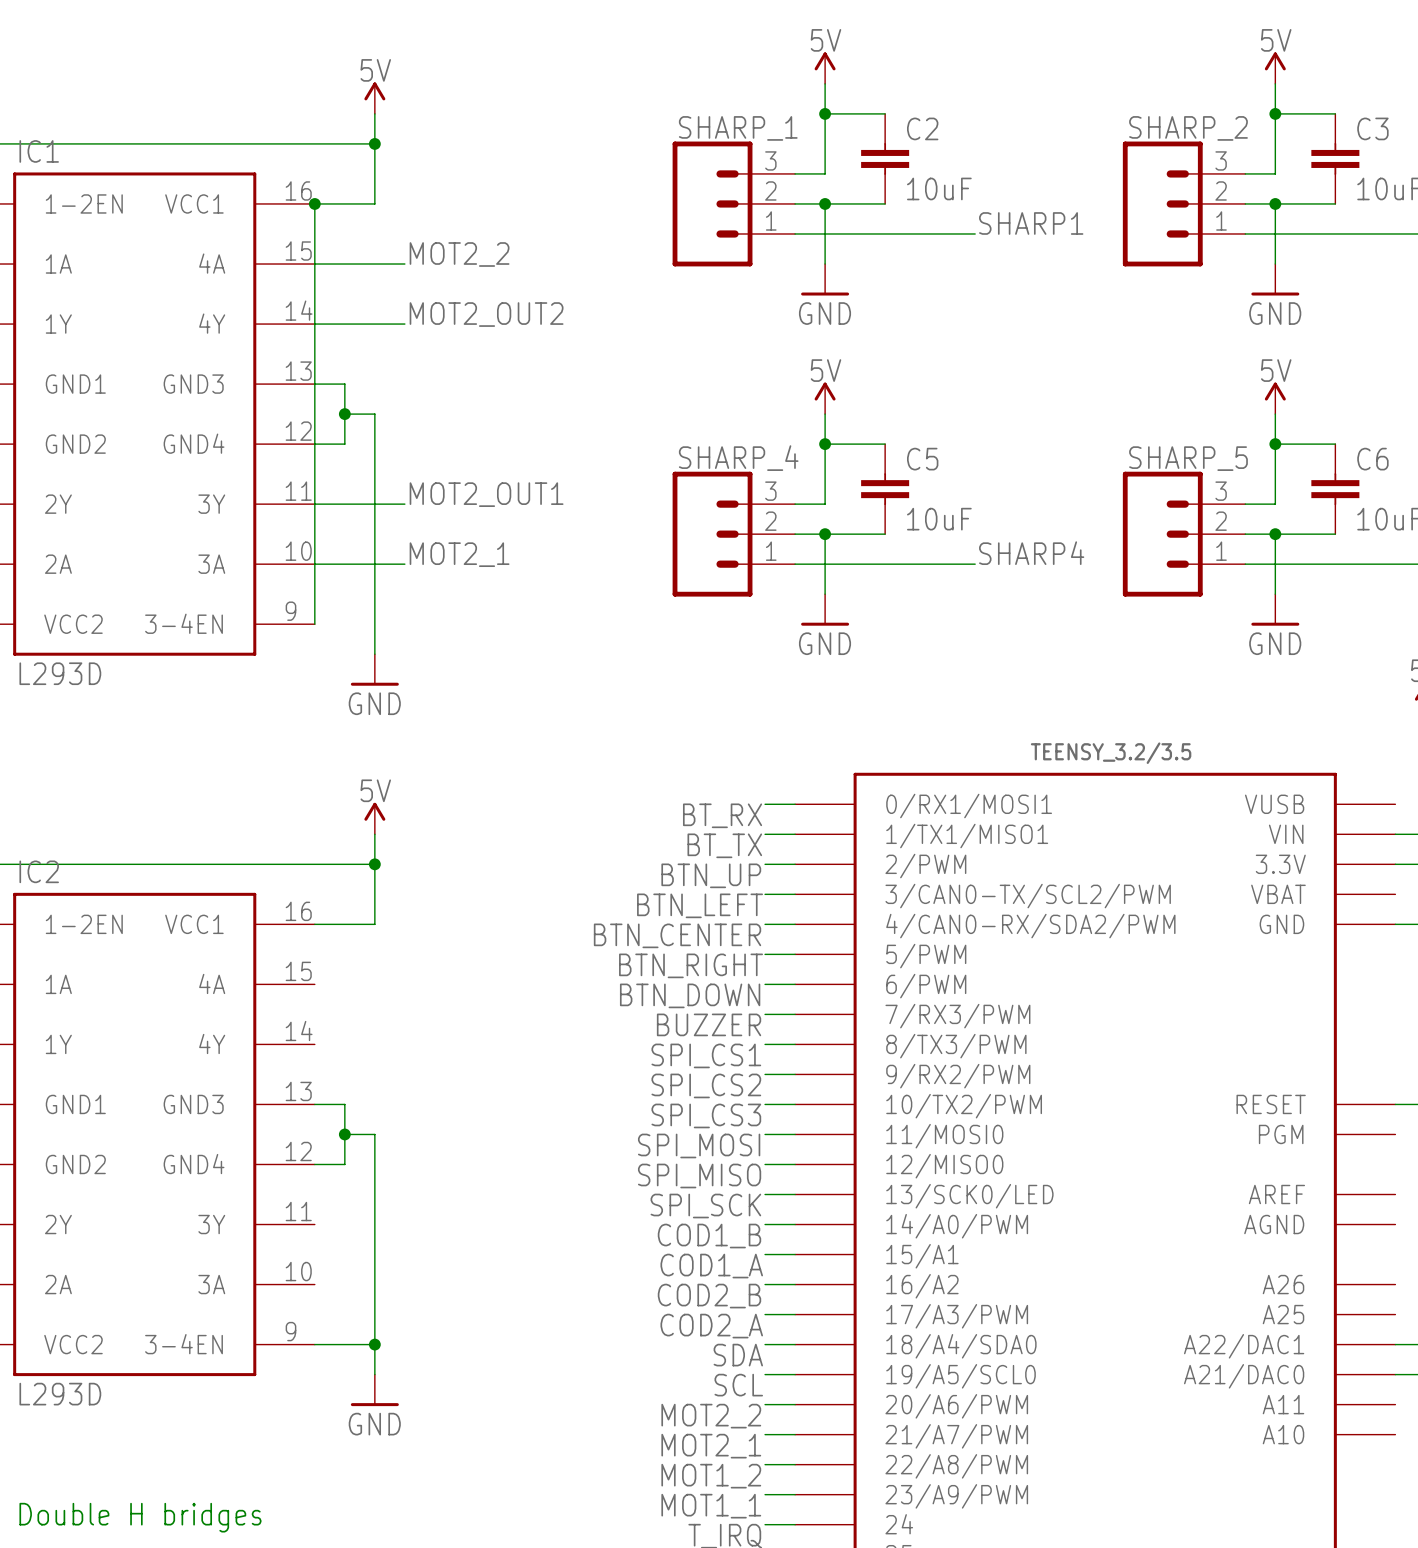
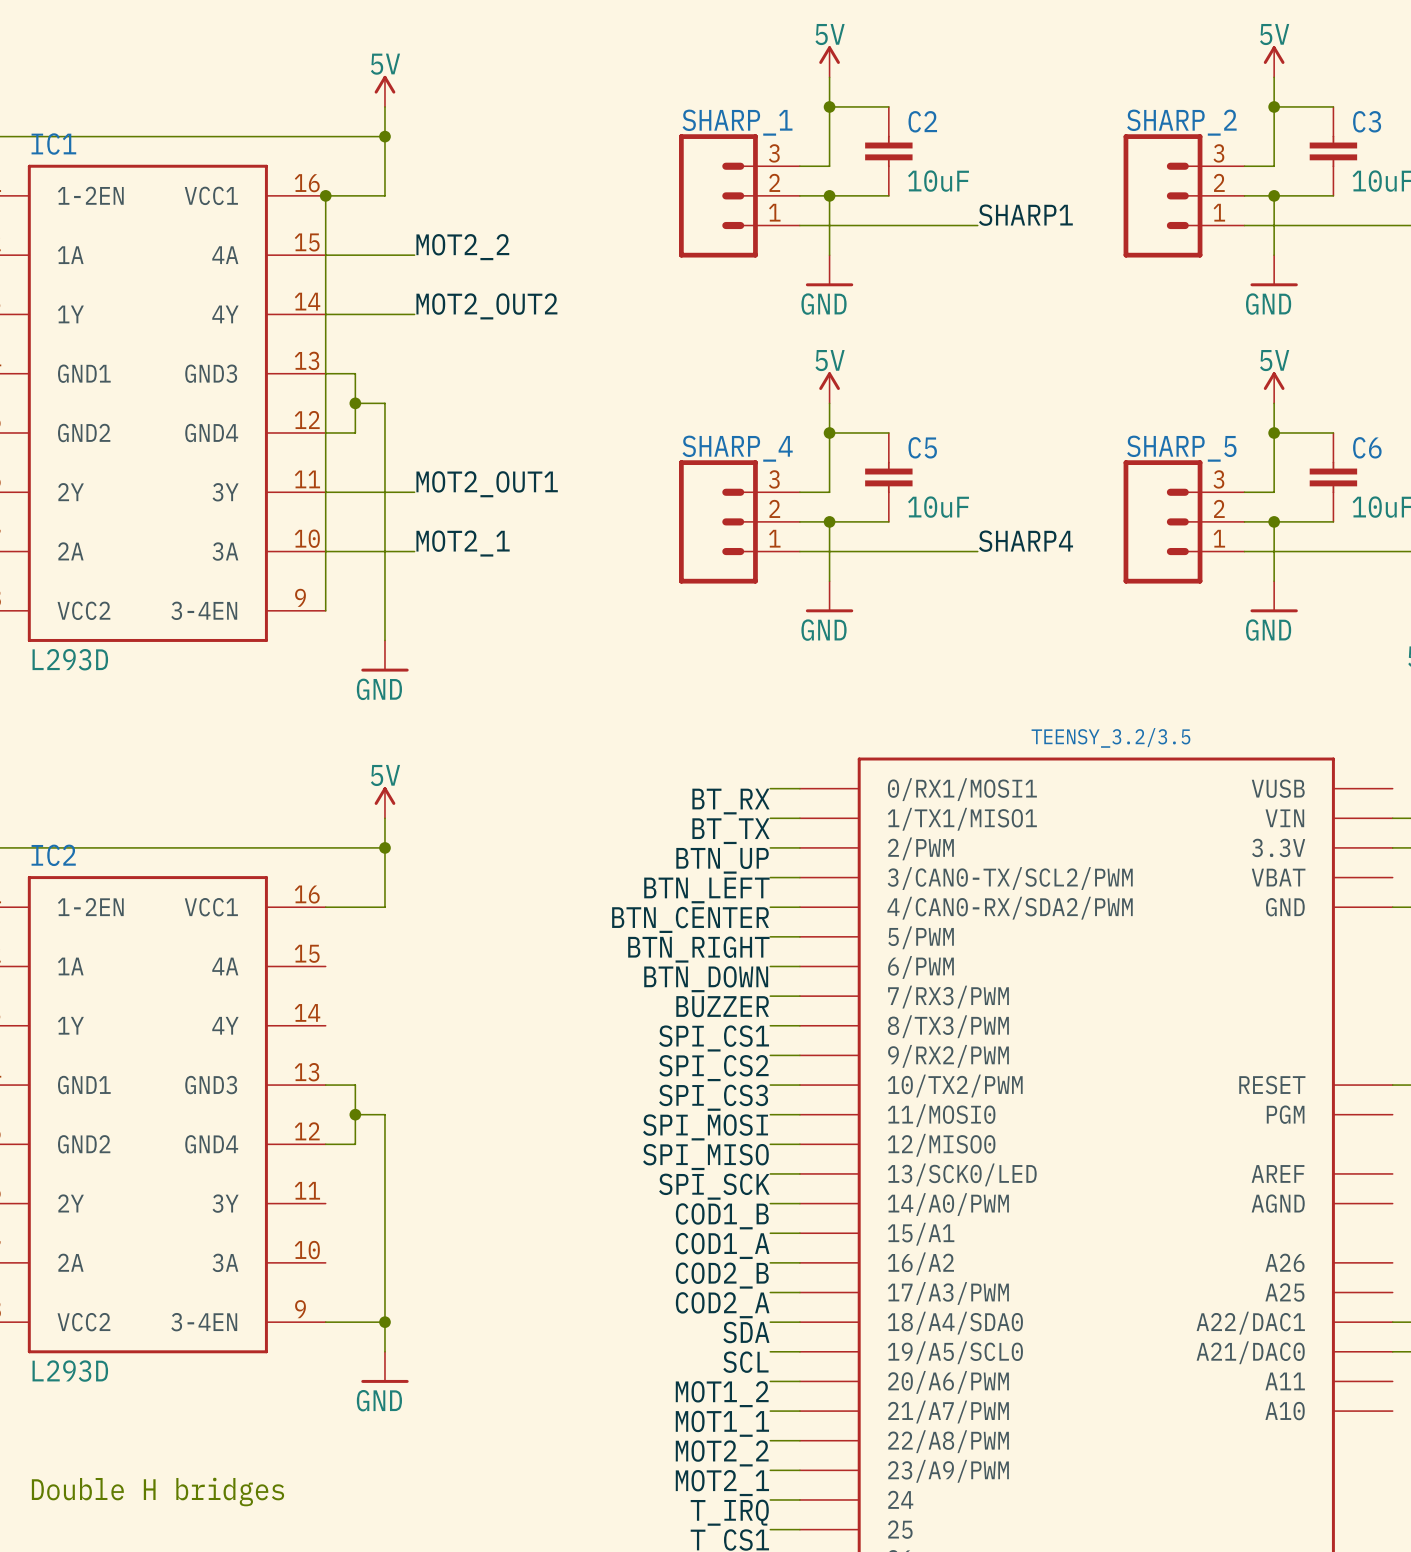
label: MOT2_2 (711, 1416) -> MOT1_2 (722, 1394)
label: MOT2_1 (711, 1446) -> MOT1_1 (722, 1423)
label: MOT1_2 (711, 1476) -> MOT2_2 (722, 1453)
label: MOT1_1 (711, 1506) -> MOT2_1 (722, 1483)

